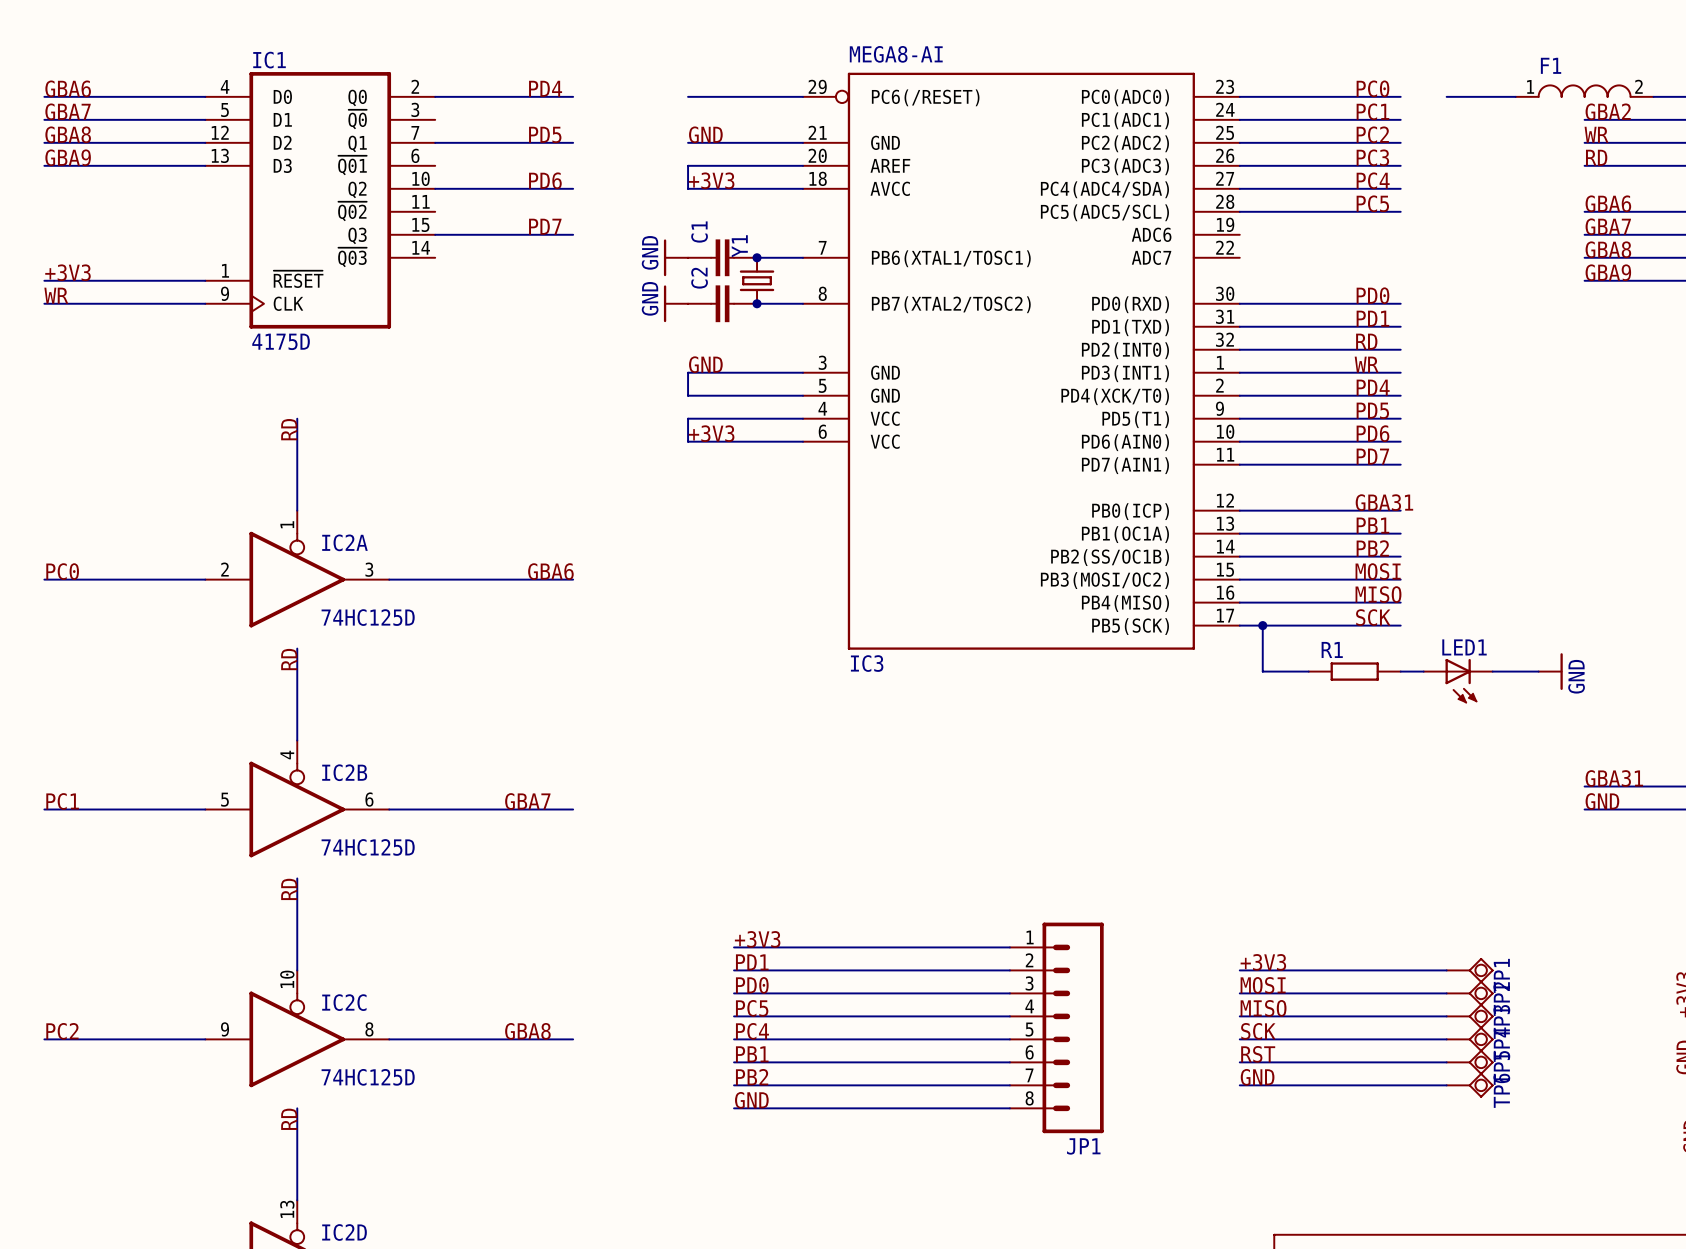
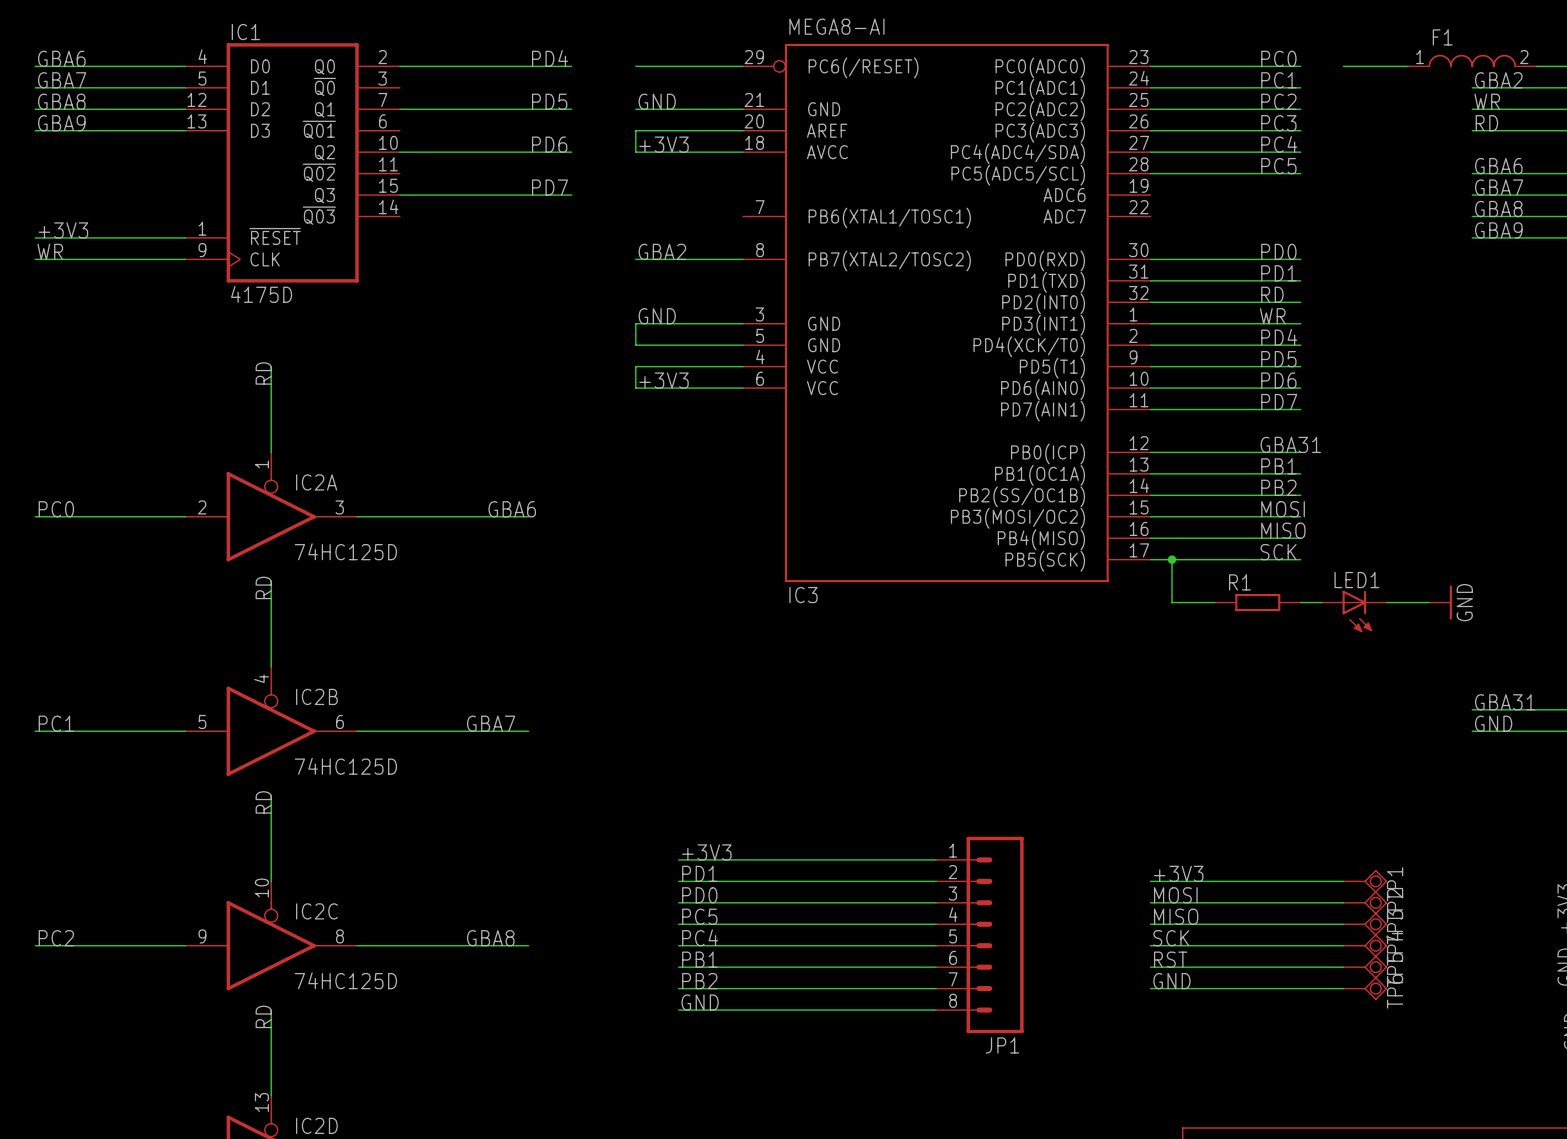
label position: PD4 (545, 88) -> PD4 (549, 58)
wire: none -> (528, 66) (571, 66)
label position: PD5 (545, 134) -> PD5 (549, 101)
wire: none -> (528, 109) (571, 109)
label position: PD6 (545, 180) -> PD6 (549, 144)
wire: none -> (528, 152) (571, 152)
label position: PD7 (545, 226) -> PD7 (549, 187)
power symbol: GND (675, 257) -> none
C1: (722, 257) -> none
wire: (757, 257) (803, 257) -> (528, 195) (571, 195)
junction: (757, 257) -> none
Y1: (757, 280) -> none
label: none -> GBA2 (662, 251)
power symbol: GND (675, 303) -> none
C2: (722, 303) -> none
junction: (757, 303) -> none

